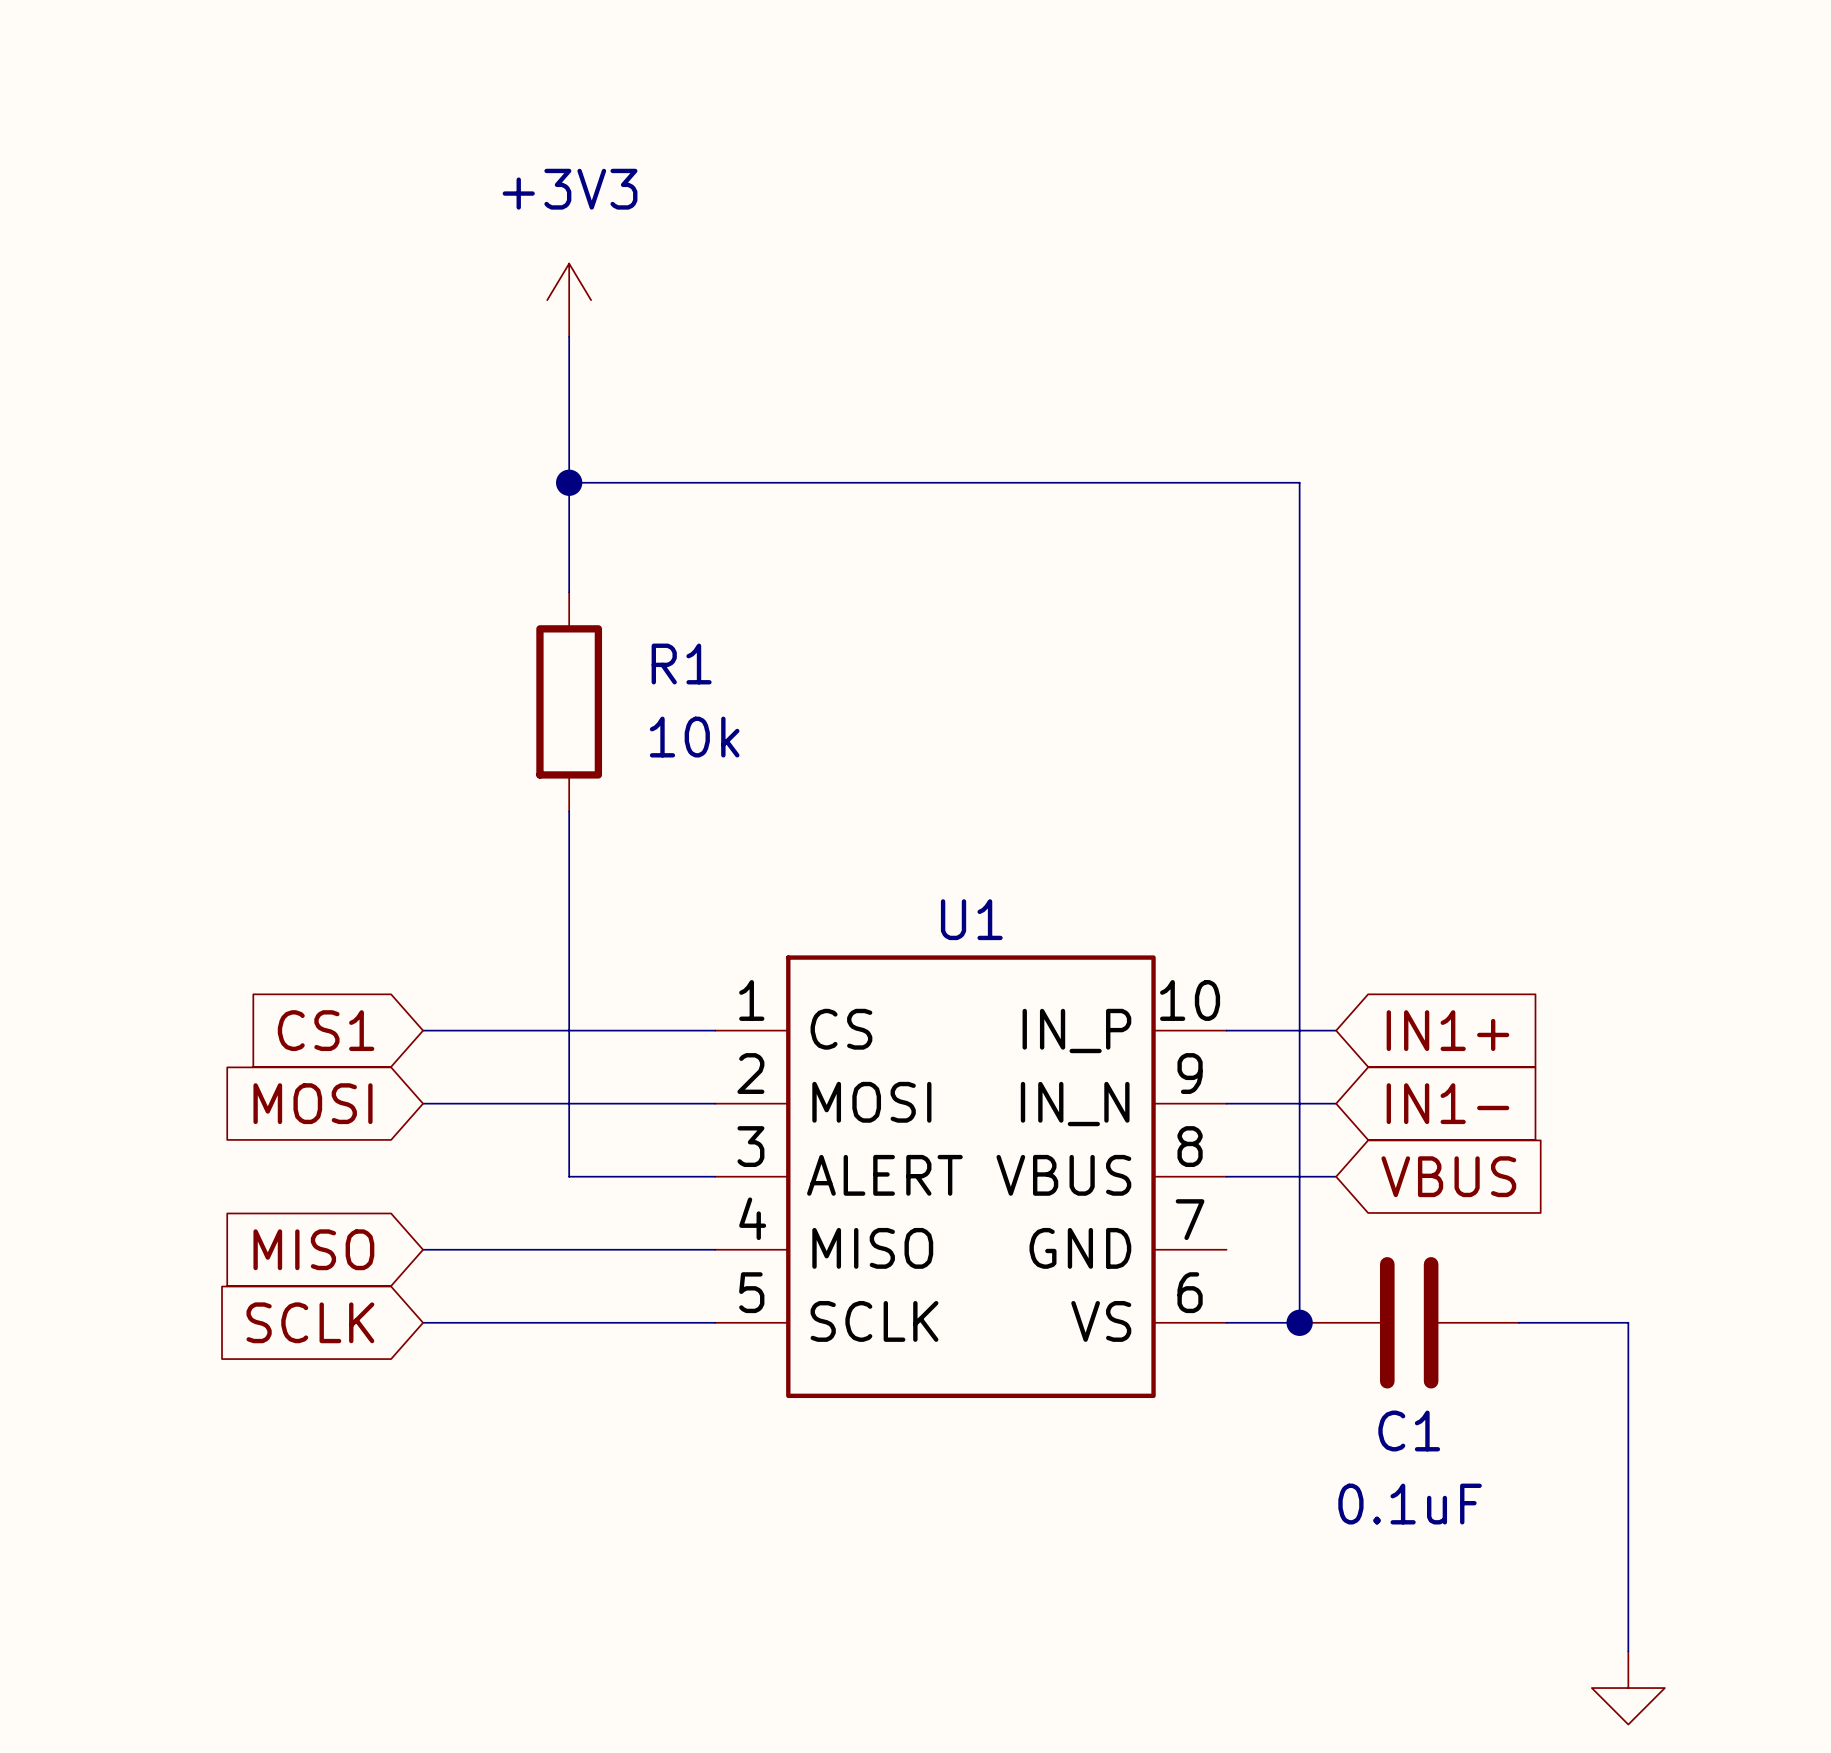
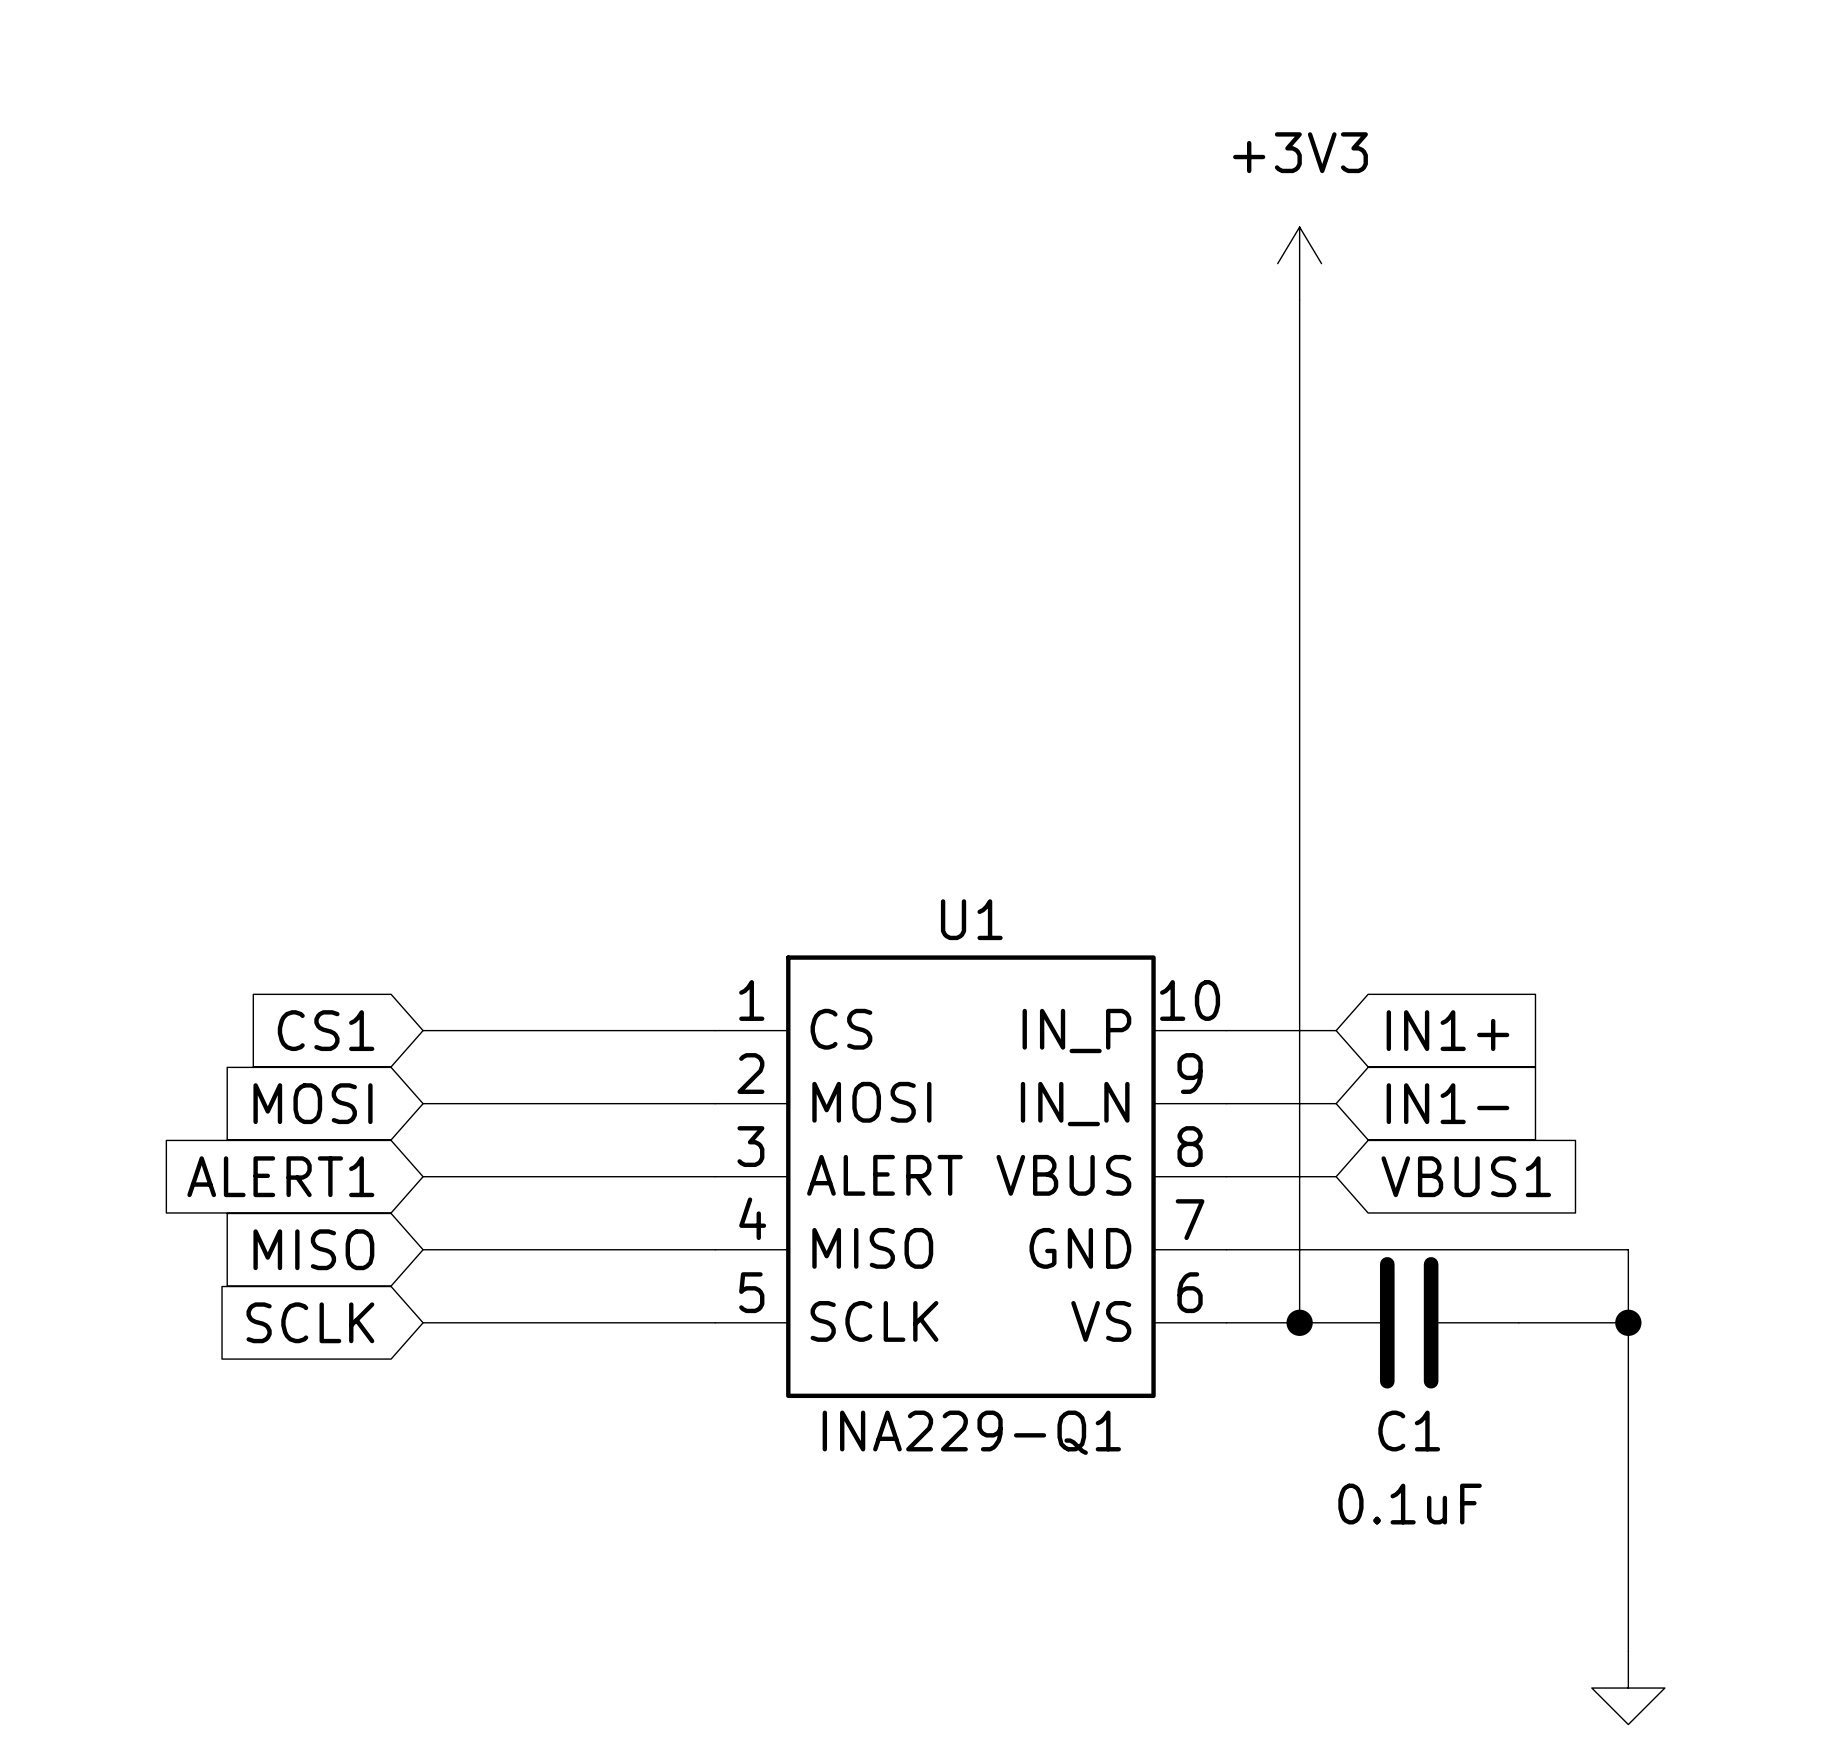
power symbol: none -> +3V3 (1299, 263)
power symbol: +3V3 (569, 300) -> none
wire: (569, 336) (569, 592) -> none
wire: (569, 482) (1299, 482) -> (1299, 300) (1299, 482)
junction: (569, 482) -> none
R1: 10k (569, 701) -> none
wire: (569, 811) (569, 1176) -> (423, 1176) (569, 1176)
global label: none -> ALERT1 (280, 1176)
global label: VBUS (1448, 1176) -> VBUS1 (1466, 1176)
wire: none -> (1226, 1249) (1628, 1249) (1628, 1322)
junction: none -> (1628, 1322)
U1 value: none -> INA229-Q1 (971, 1432)

